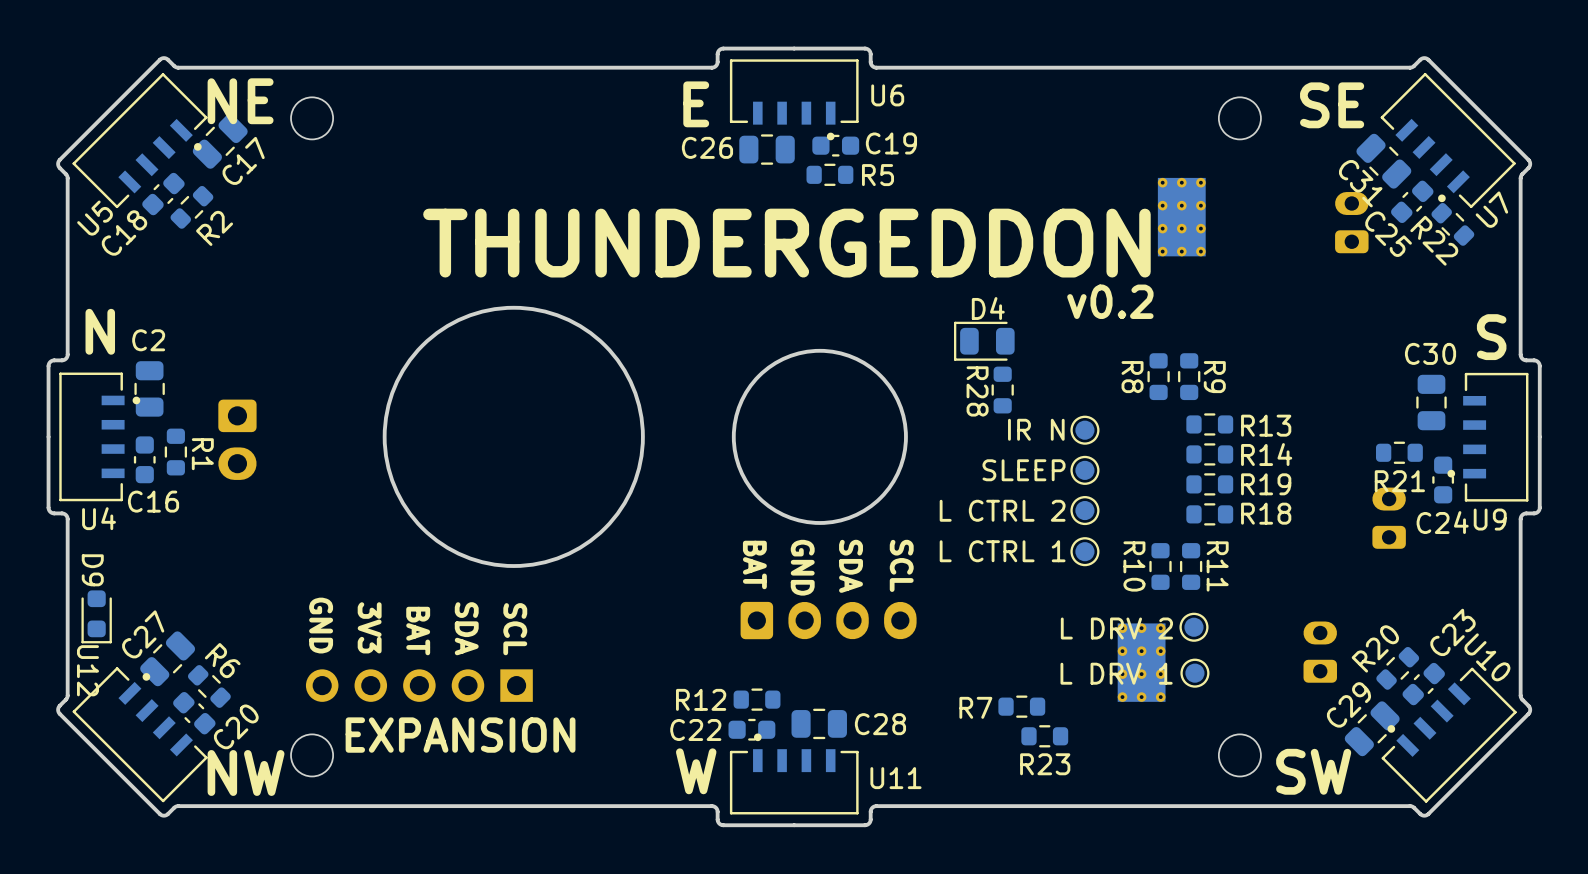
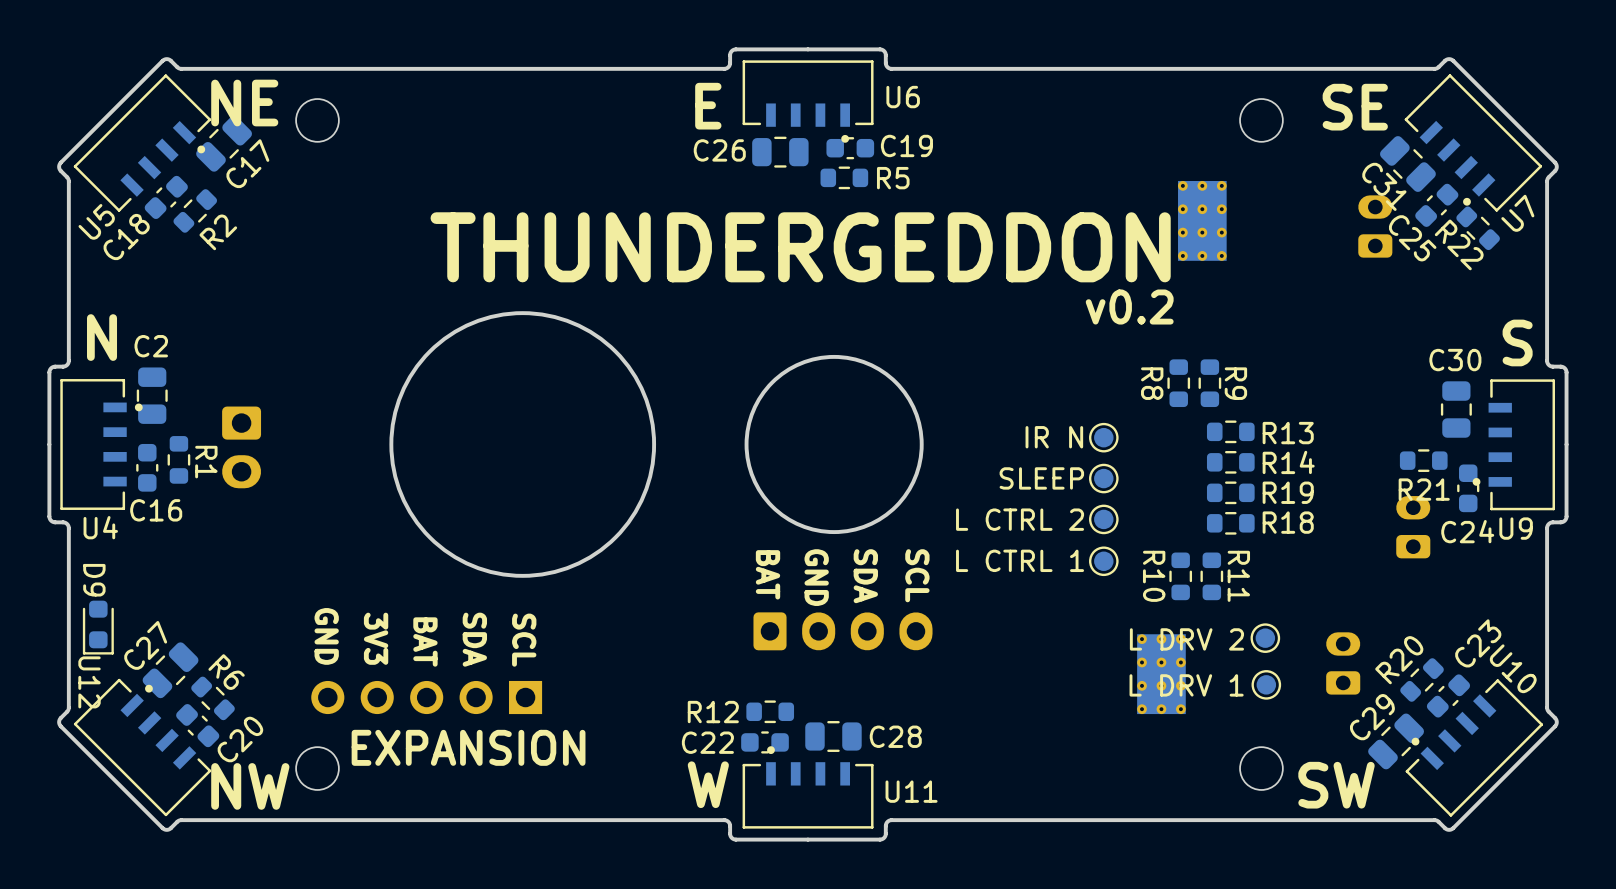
D4: (984, 341) -> none
R28: (1002, 390) -> none
part: (1193, 627) -> none
part: none -> (1265, 638)
text position: L DRV 2 (1116, 628) -> L DRV 2 (1186, 639)
text position: L DRV 1 (1116, 673) -> L DRV 1 (1186, 685)
part: (1194, 673) -> none
part: none -> (1266, 684)
R7: (1021, 706) -> none
R23: (1044, 736) -> none

